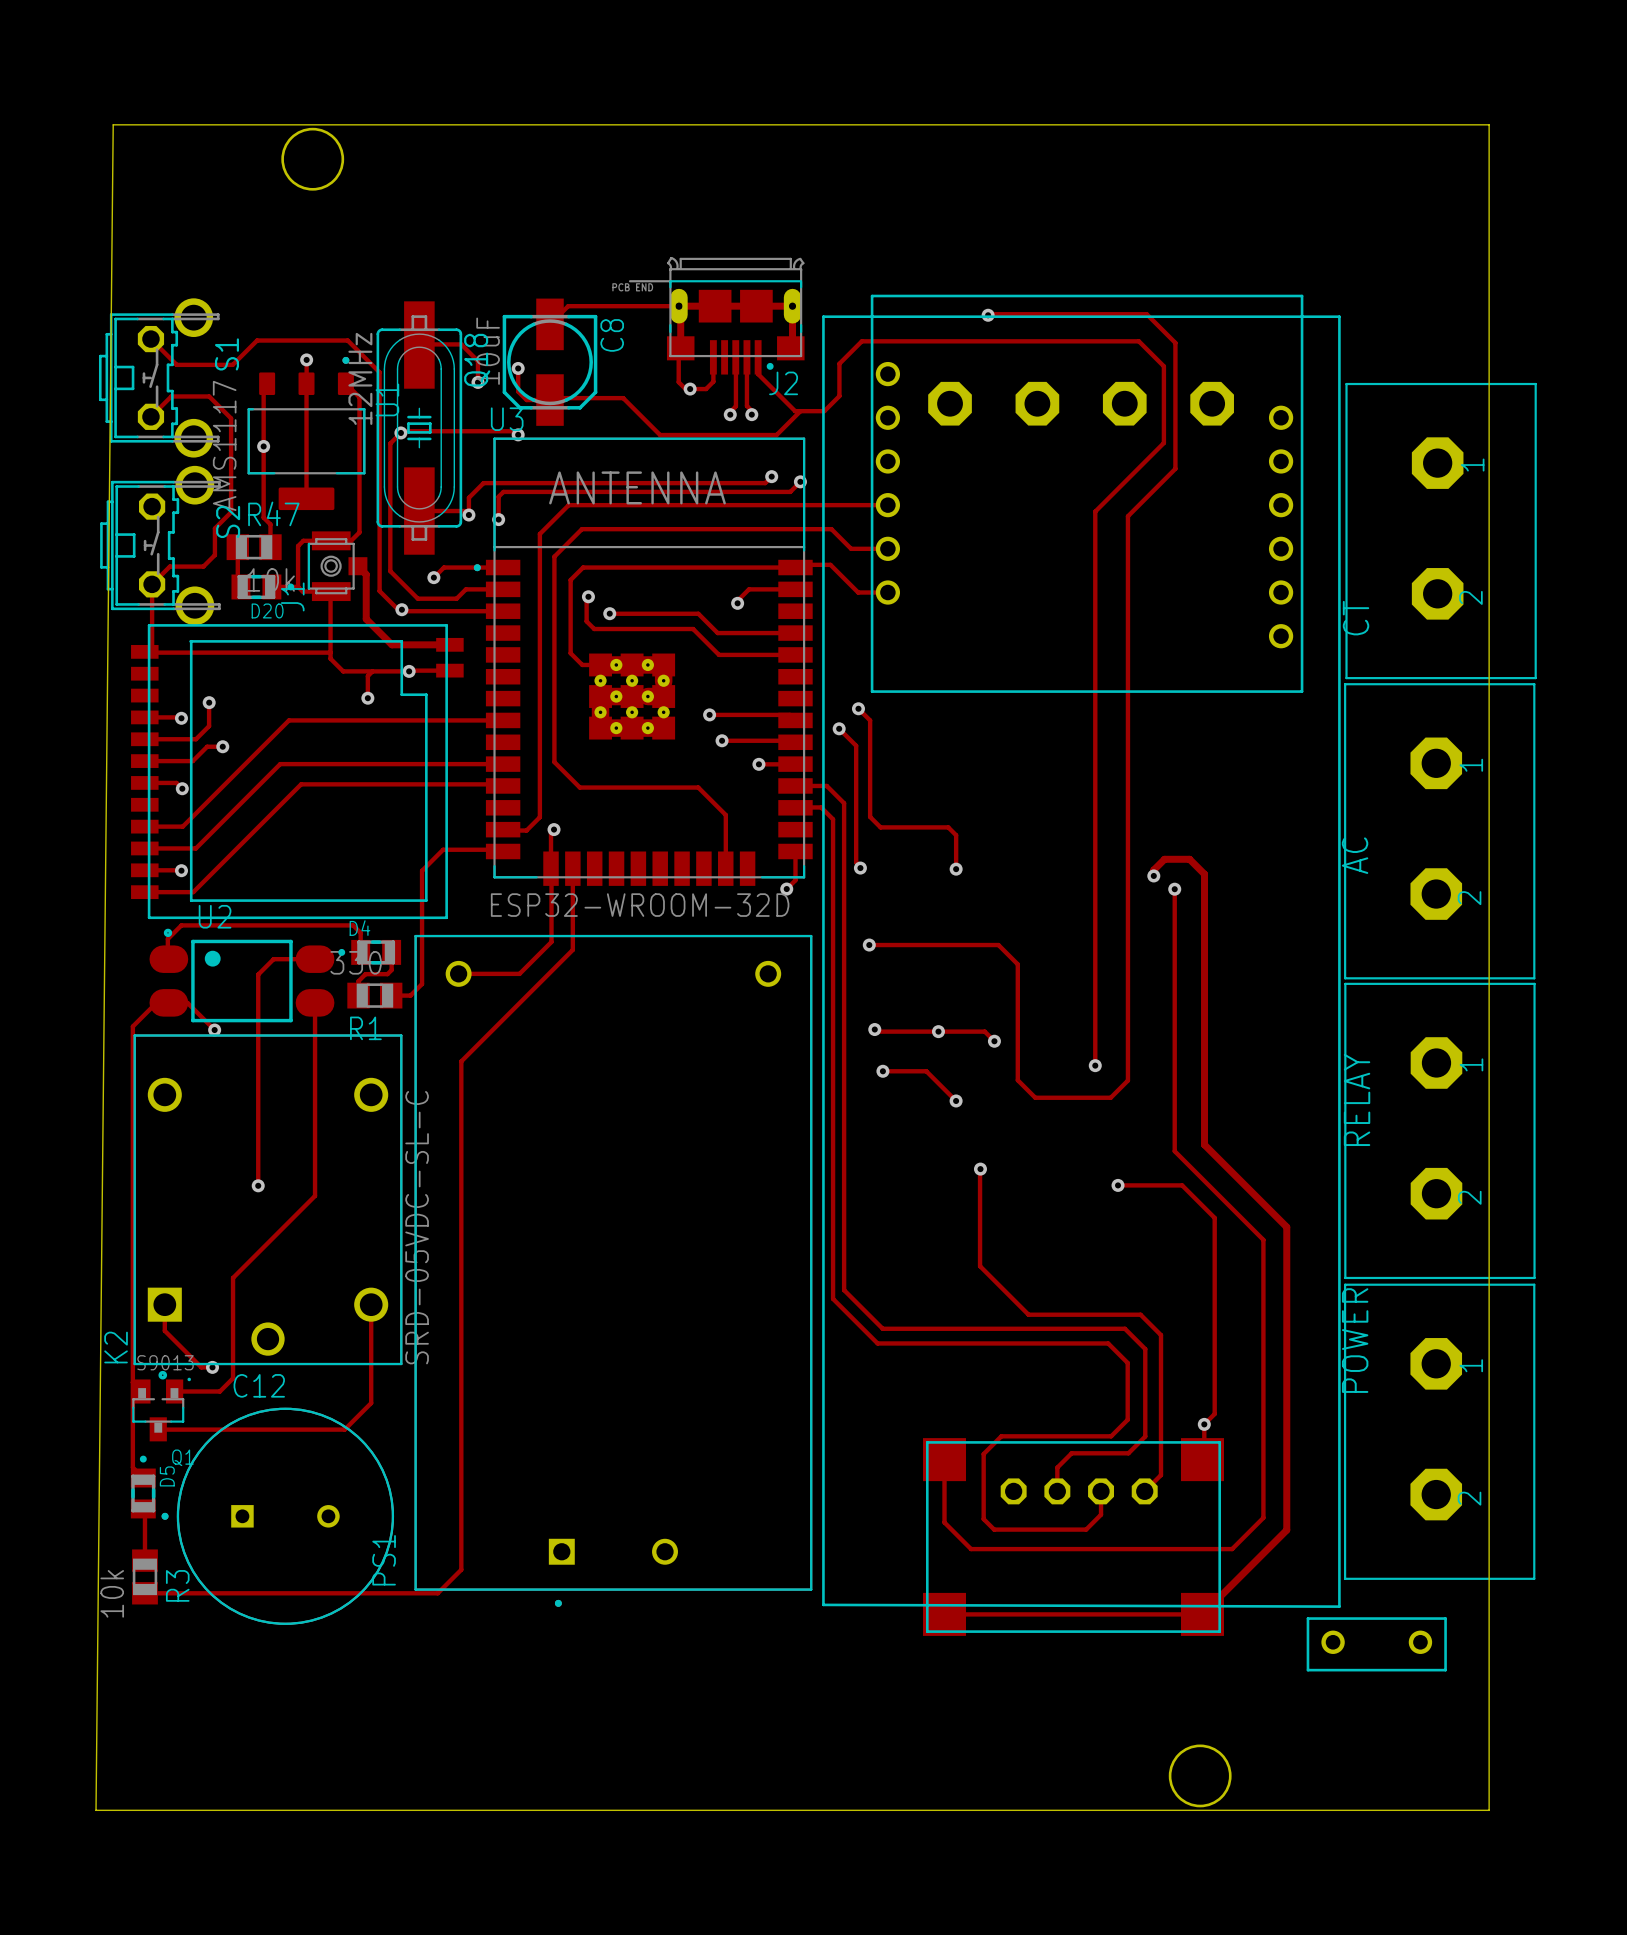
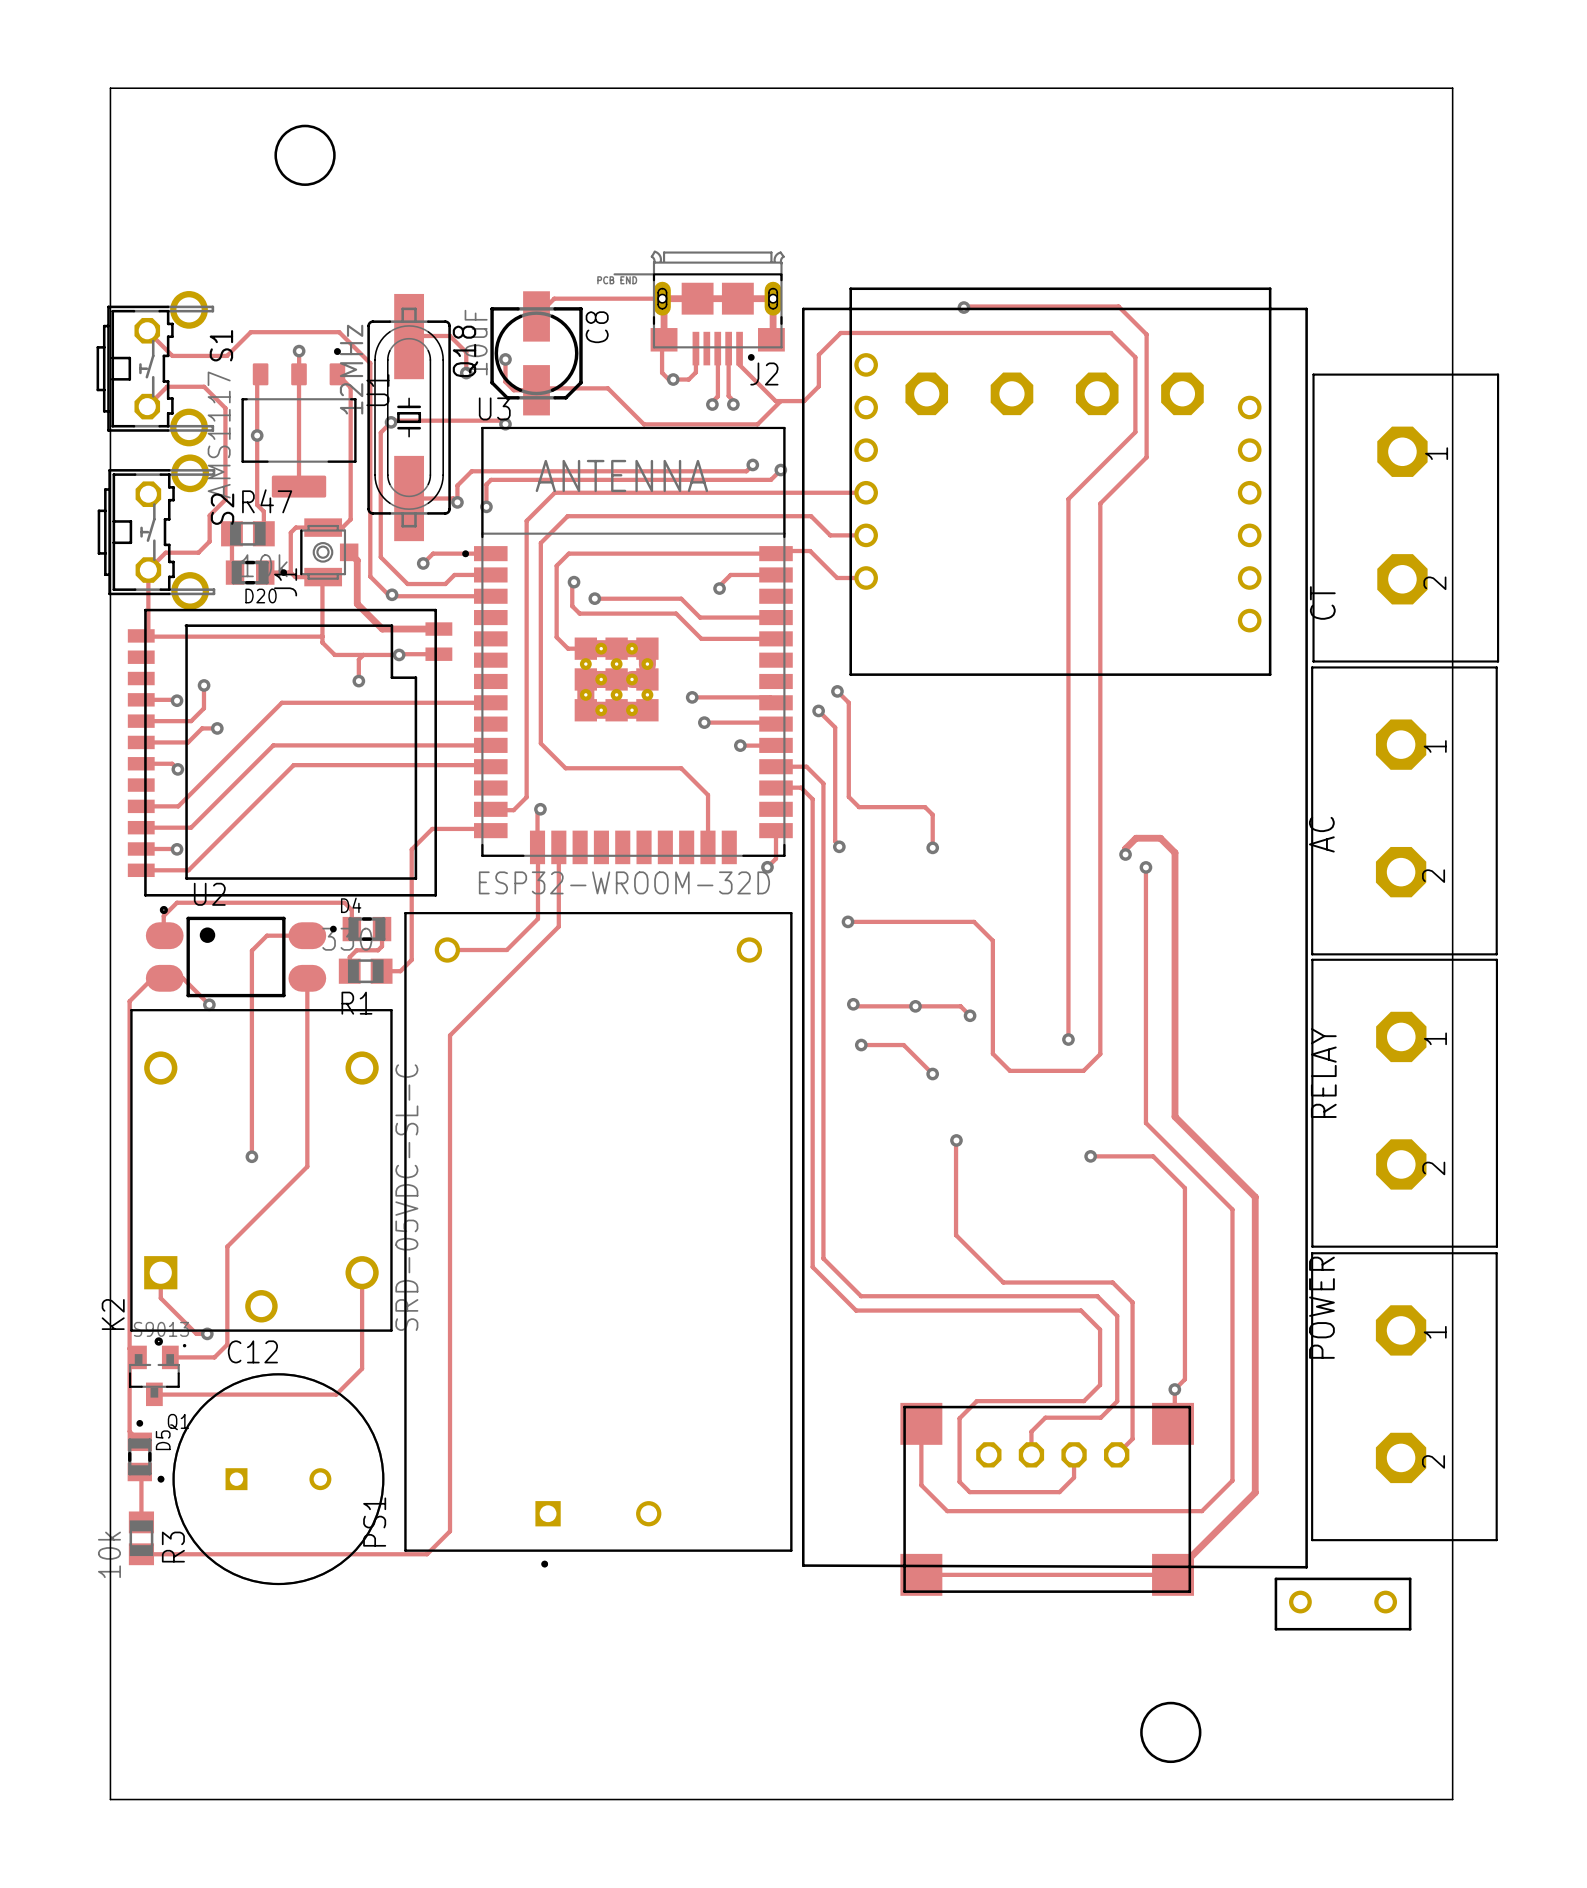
board edge: (1489, 124) (113, 124) (96, 1810) (1489, 1810) -> (1452, 121) (1452, 88) (110, 88) (110, 1799) (1452, 1799) (1452, 1765)

